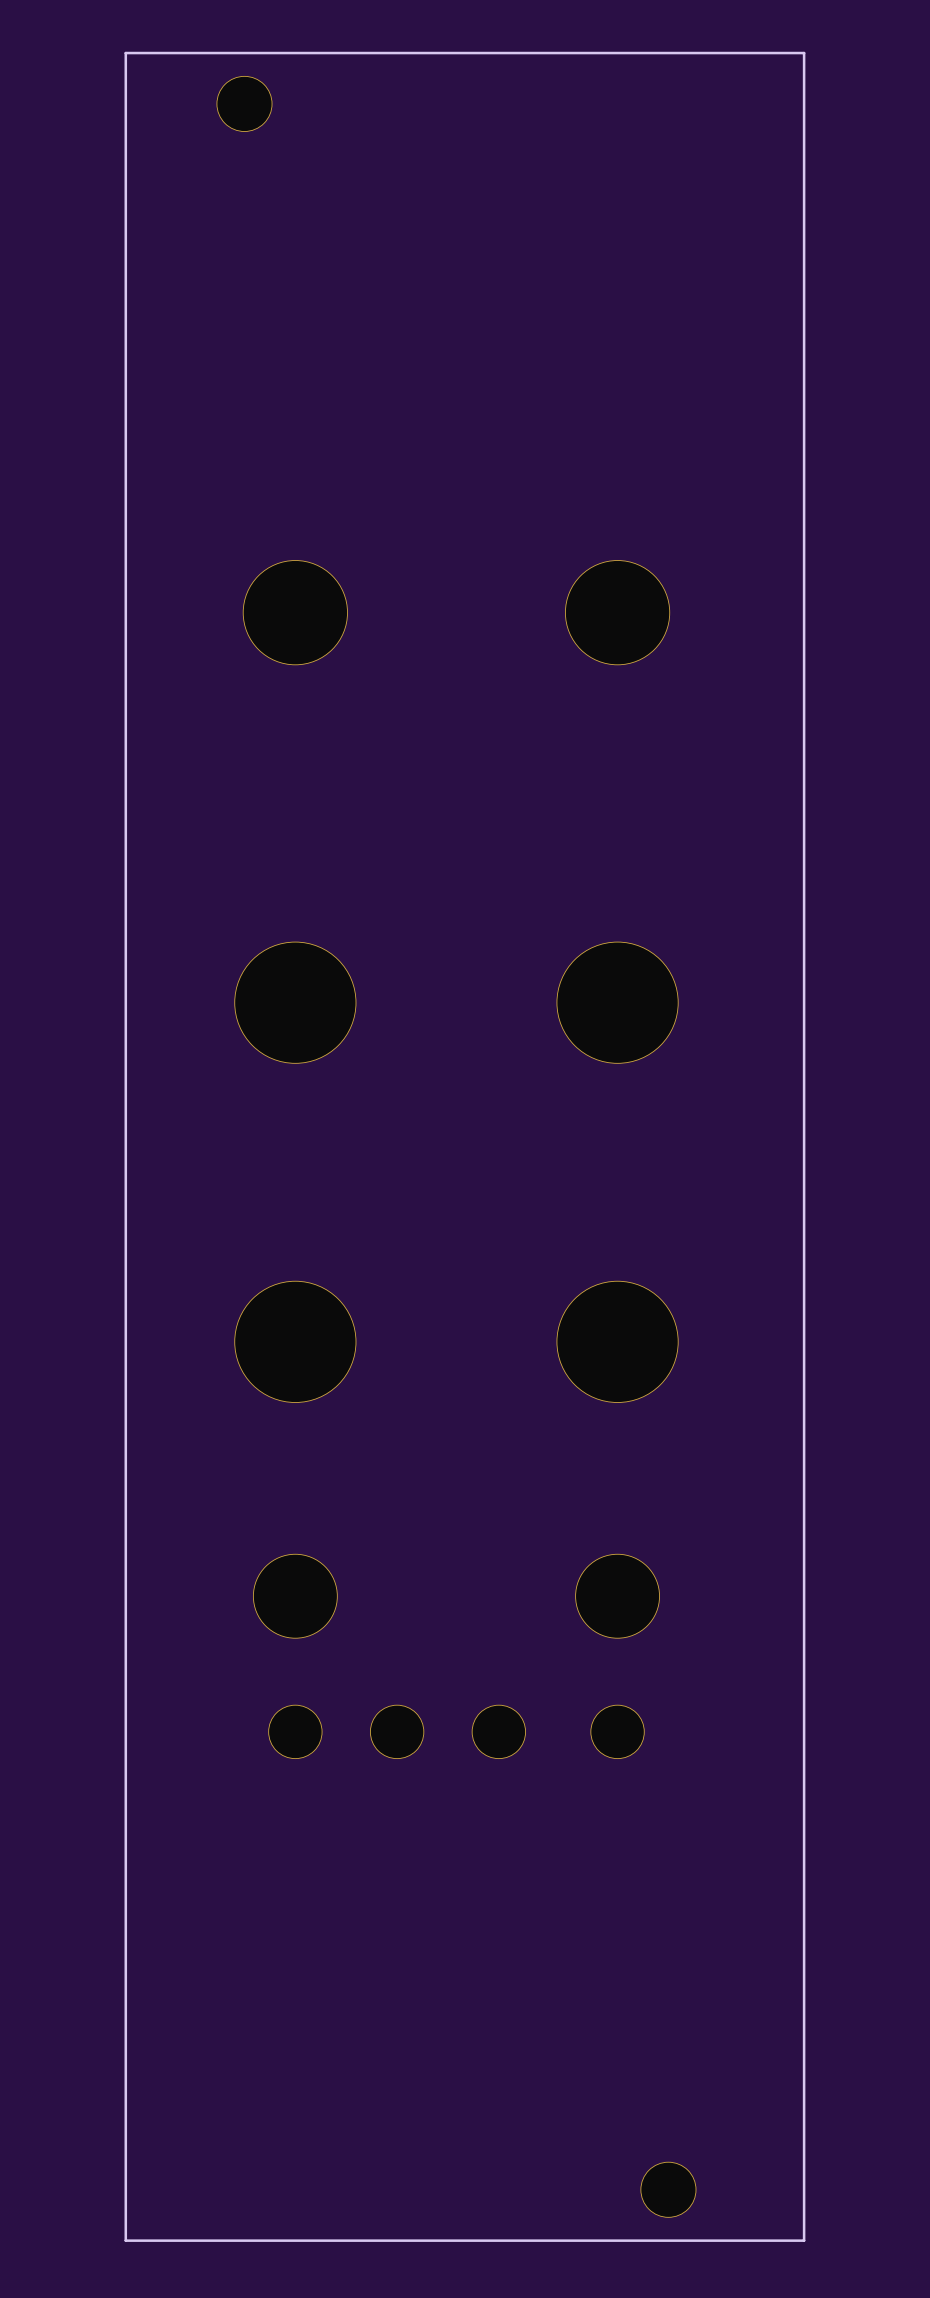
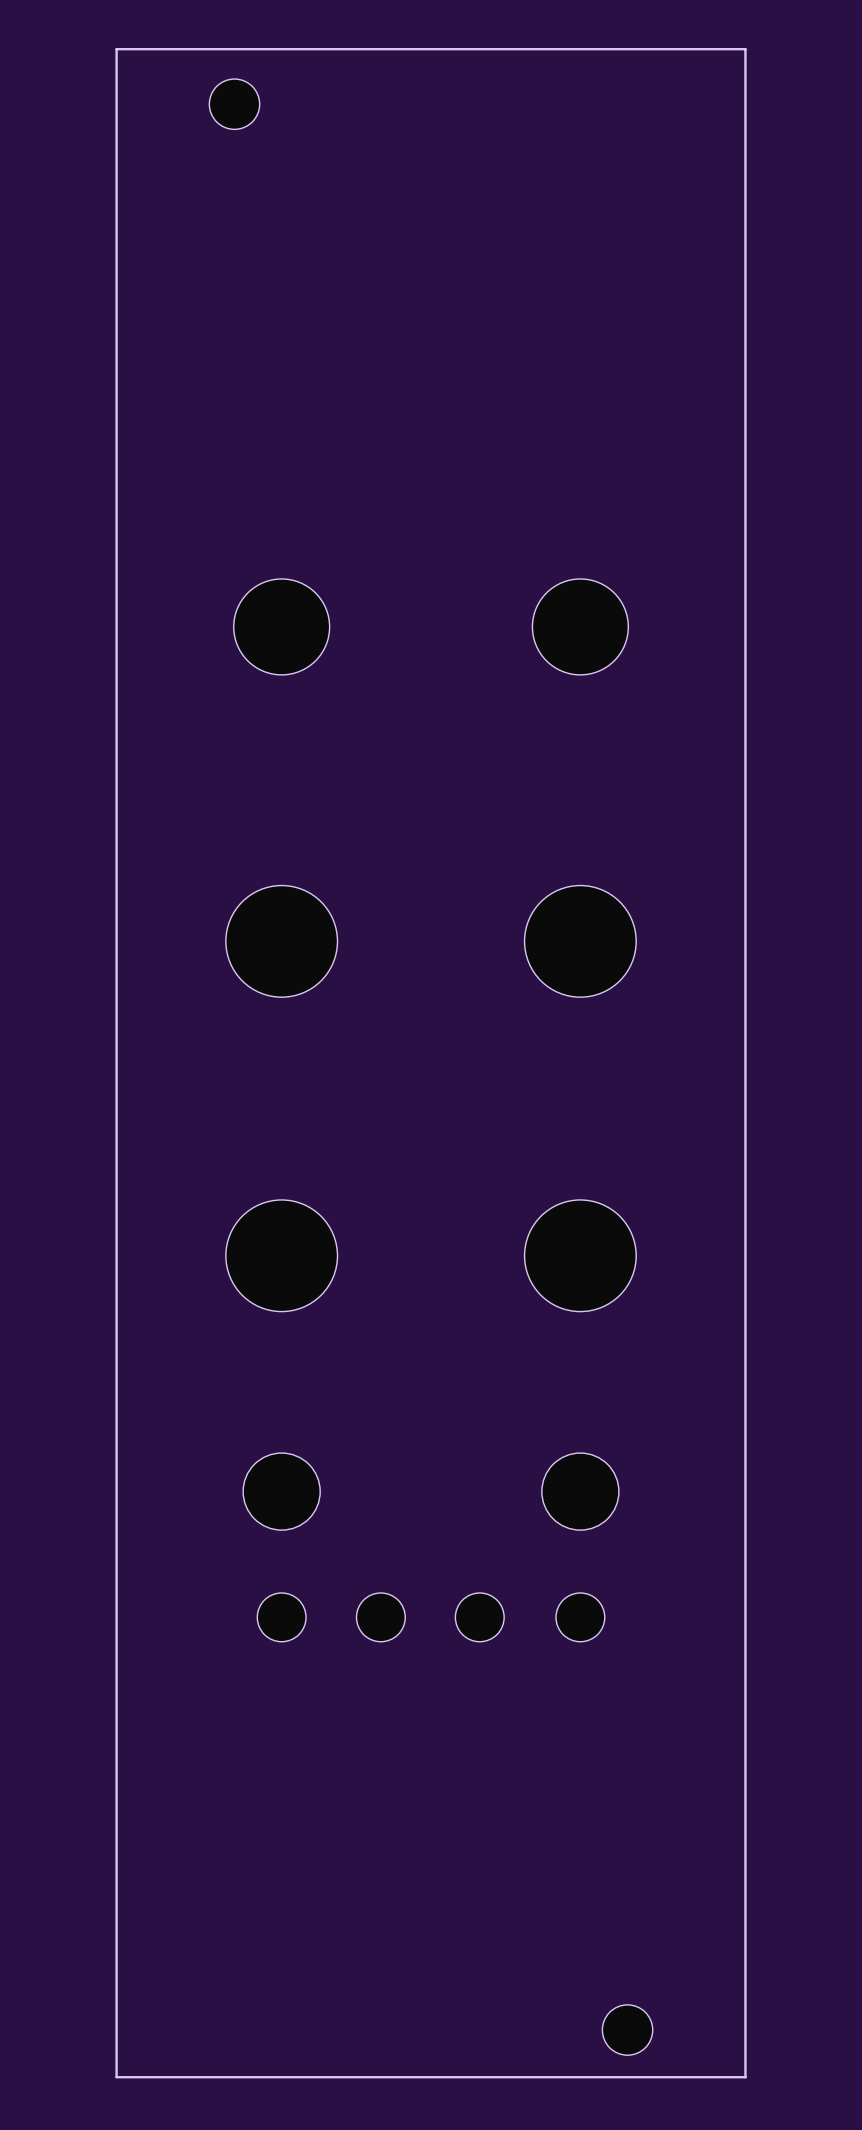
via: (244, 103) -> none
part: none -> (234, 104)
via: (295, 612) -> none
via: (617, 612) -> none
part: none -> (281, 626)
part: none -> (580, 626)
via: (295, 1002) -> none
via: (617, 1002) -> none
part: none -> (281, 941)
part: none -> (580, 941)
via: (295, 1341) -> none
via: (617, 1341) -> none
part: none -> (281, 1255)
part: none -> (580, 1255)
via: (295, 1596) -> none
via: (617, 1596) -> none
part: none -> (281, 1491)
part: none -> (580, 1491)
via: (295, 1731) -> none
via: (397, 1731) -> none
via: (498, 1731) -> none
via: (617, 1731) -> none
part: none -> (281, 1617)
part: none -> (380, 1617)
part: none -> (479, 1617)
part: none -> (580, 1617)
via: (668, 2189) -> none
part: none -> (627, 2030)

